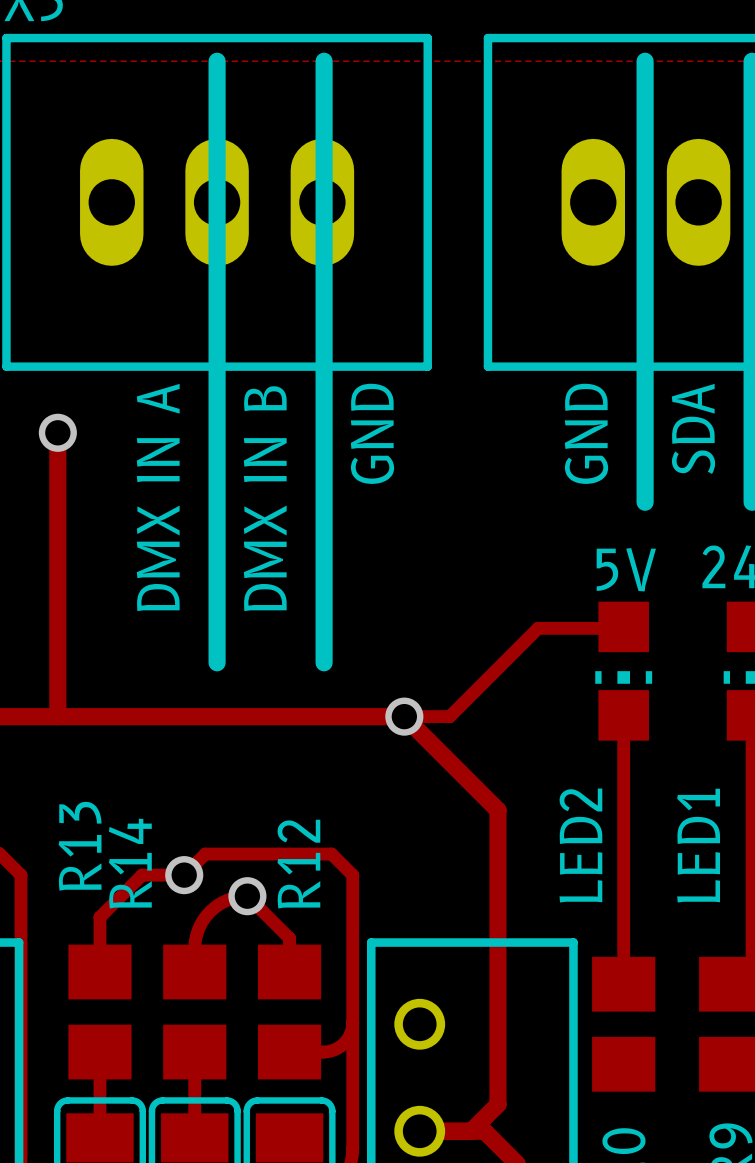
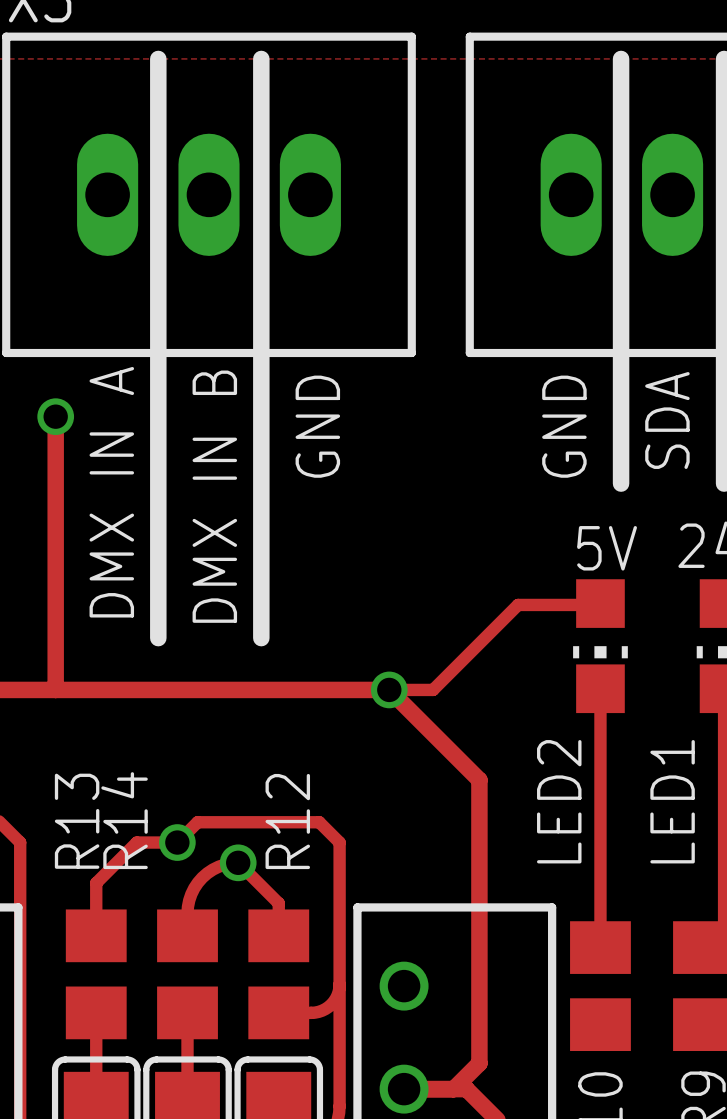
line: (217, 61) (217, 662) -> (158, 58) (158, 638)
line: (324, 61) (324, 662) -> (261, 58) (261, 638)
text position: GND (372, 433) -> GND (317, 426)
text position: DMX IN A (158, 497) -> DMX IN A (111, 492)
text position: DMX IN B (265, 498) -> DMX IN B (214, 496)

